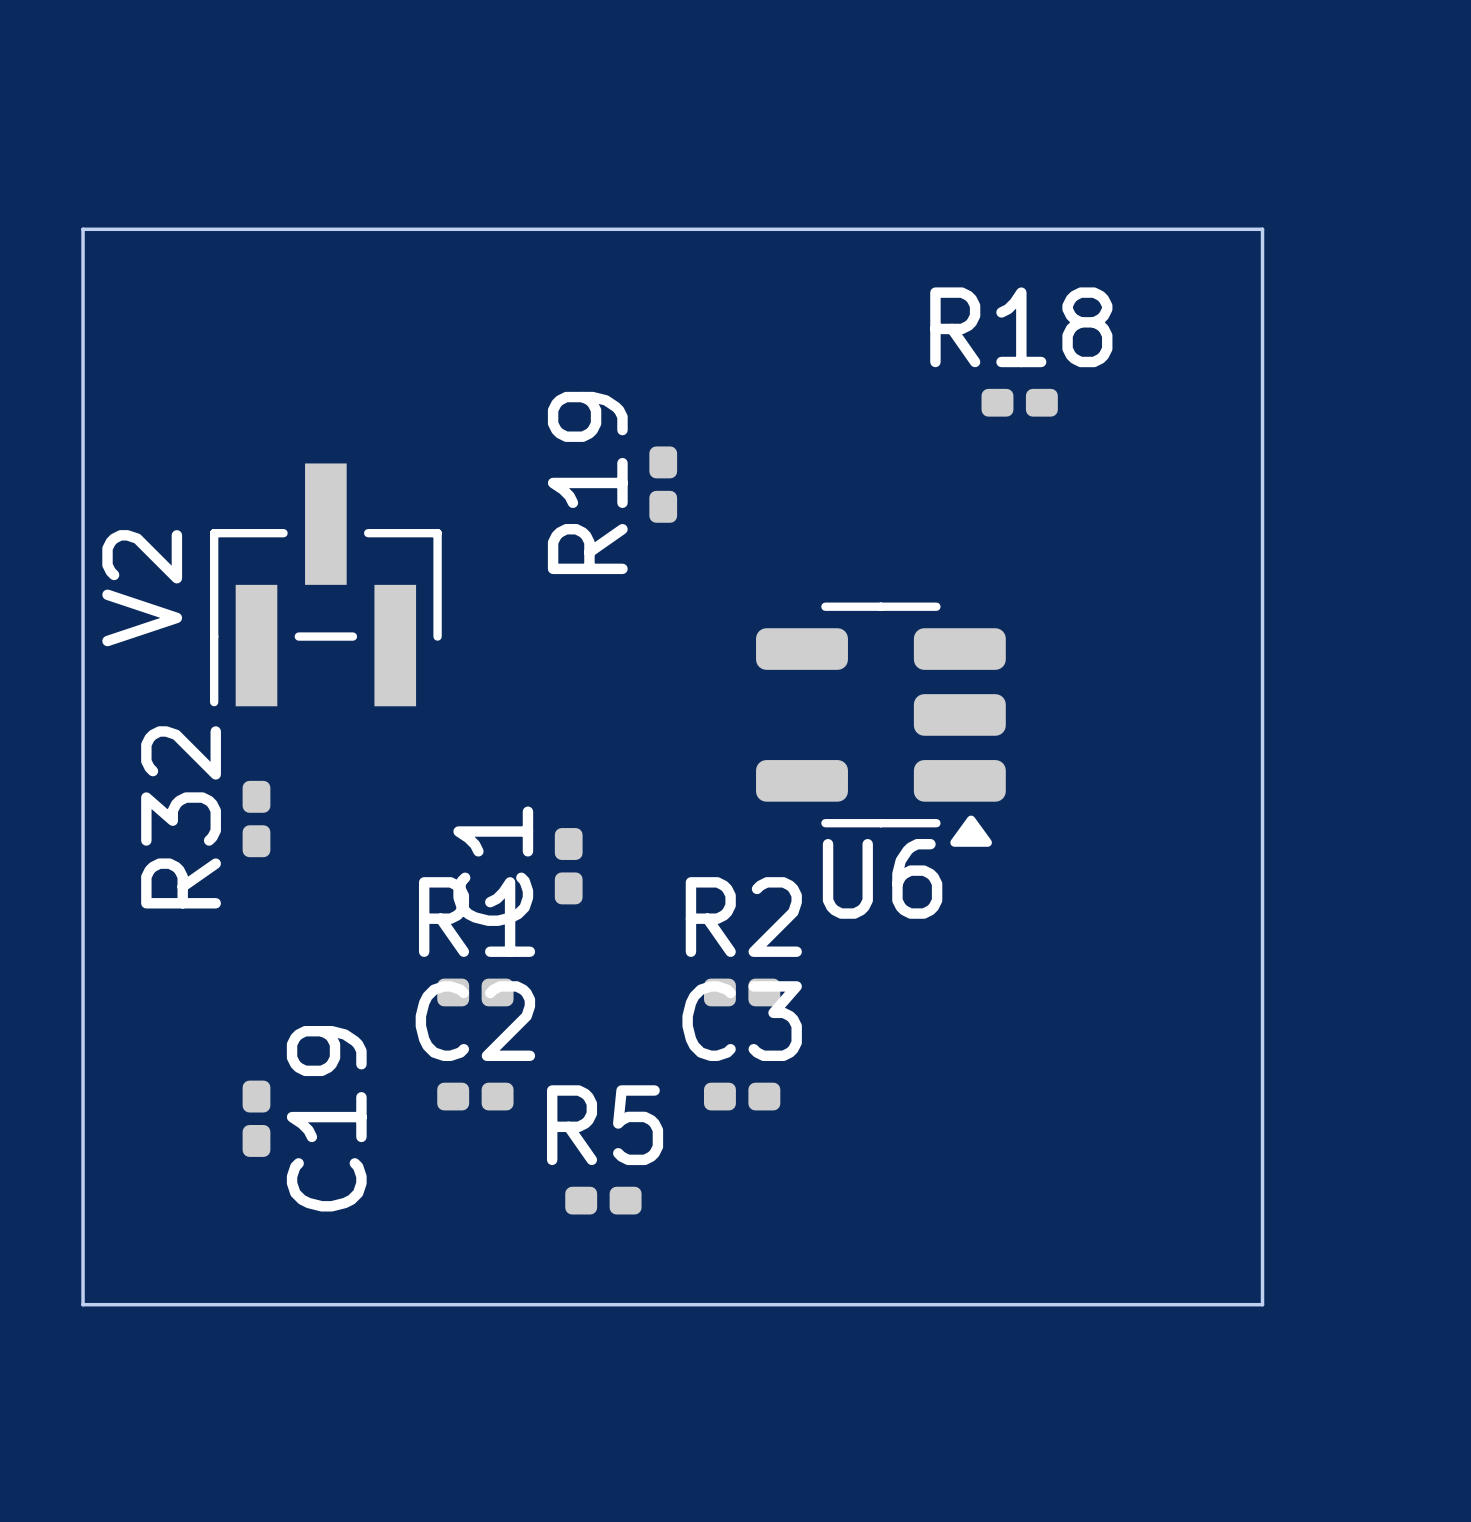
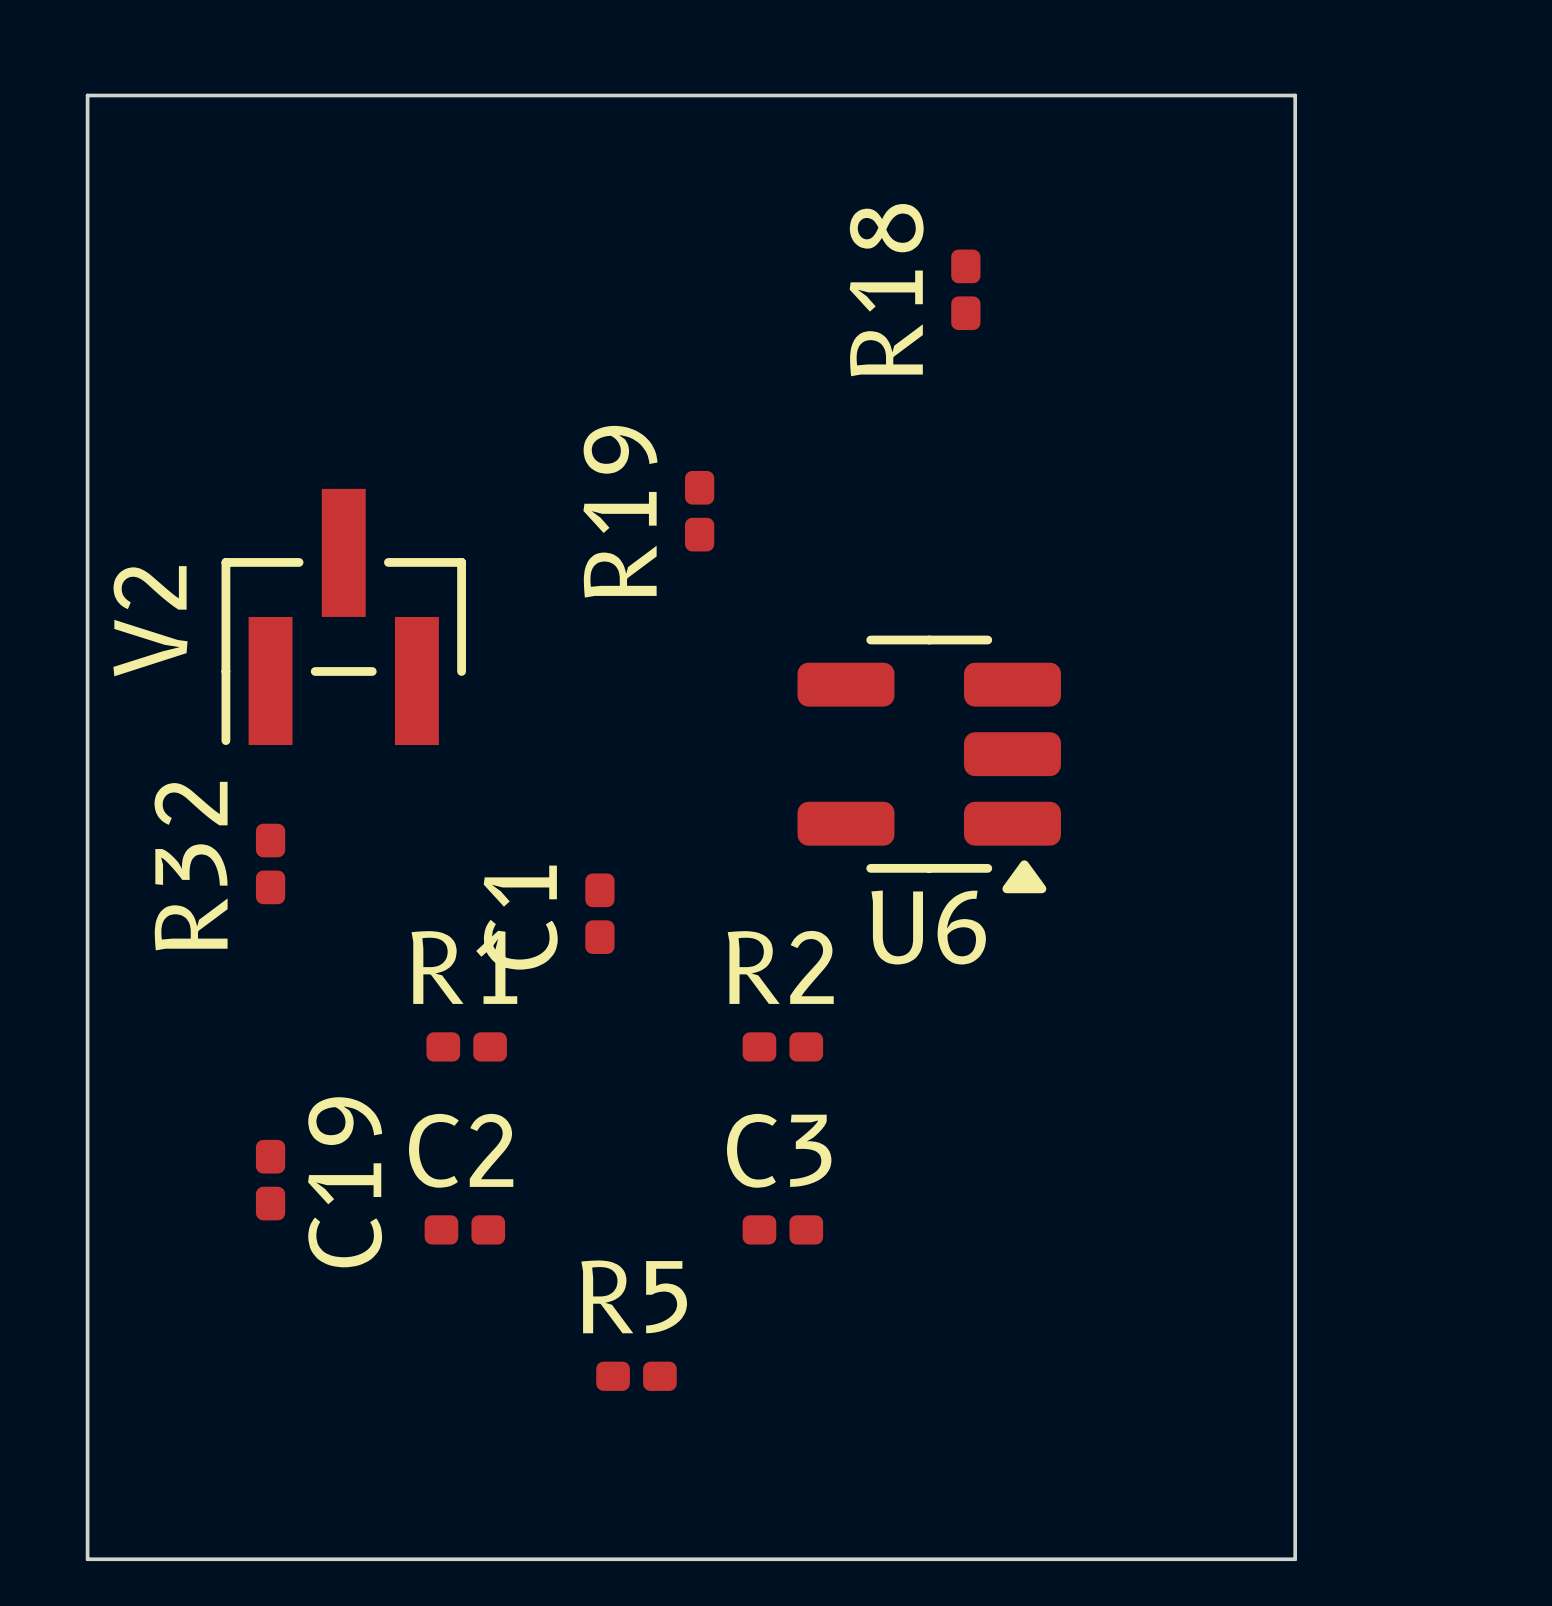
board edge: (83, 229) (1262, 229) (1262, 1304) (83, 1304) -> (87, 241) (87, 95) (1295, 95) (1295, 1559) (87, 1559) (87, 1376)
R18 rotation: 0° (1019, 402) -> 90° clockwise (965, 289)
R18 position: (1019, 402) -> (965, 289)
R1 position: (475, 992) -> (466, 1046)
C2 position: (475, 1096) -> (464, 1229)
C3 position: (742, 1096) -> (782, 1229)
R5 position: (603, 1200) -> (636, 1376)

